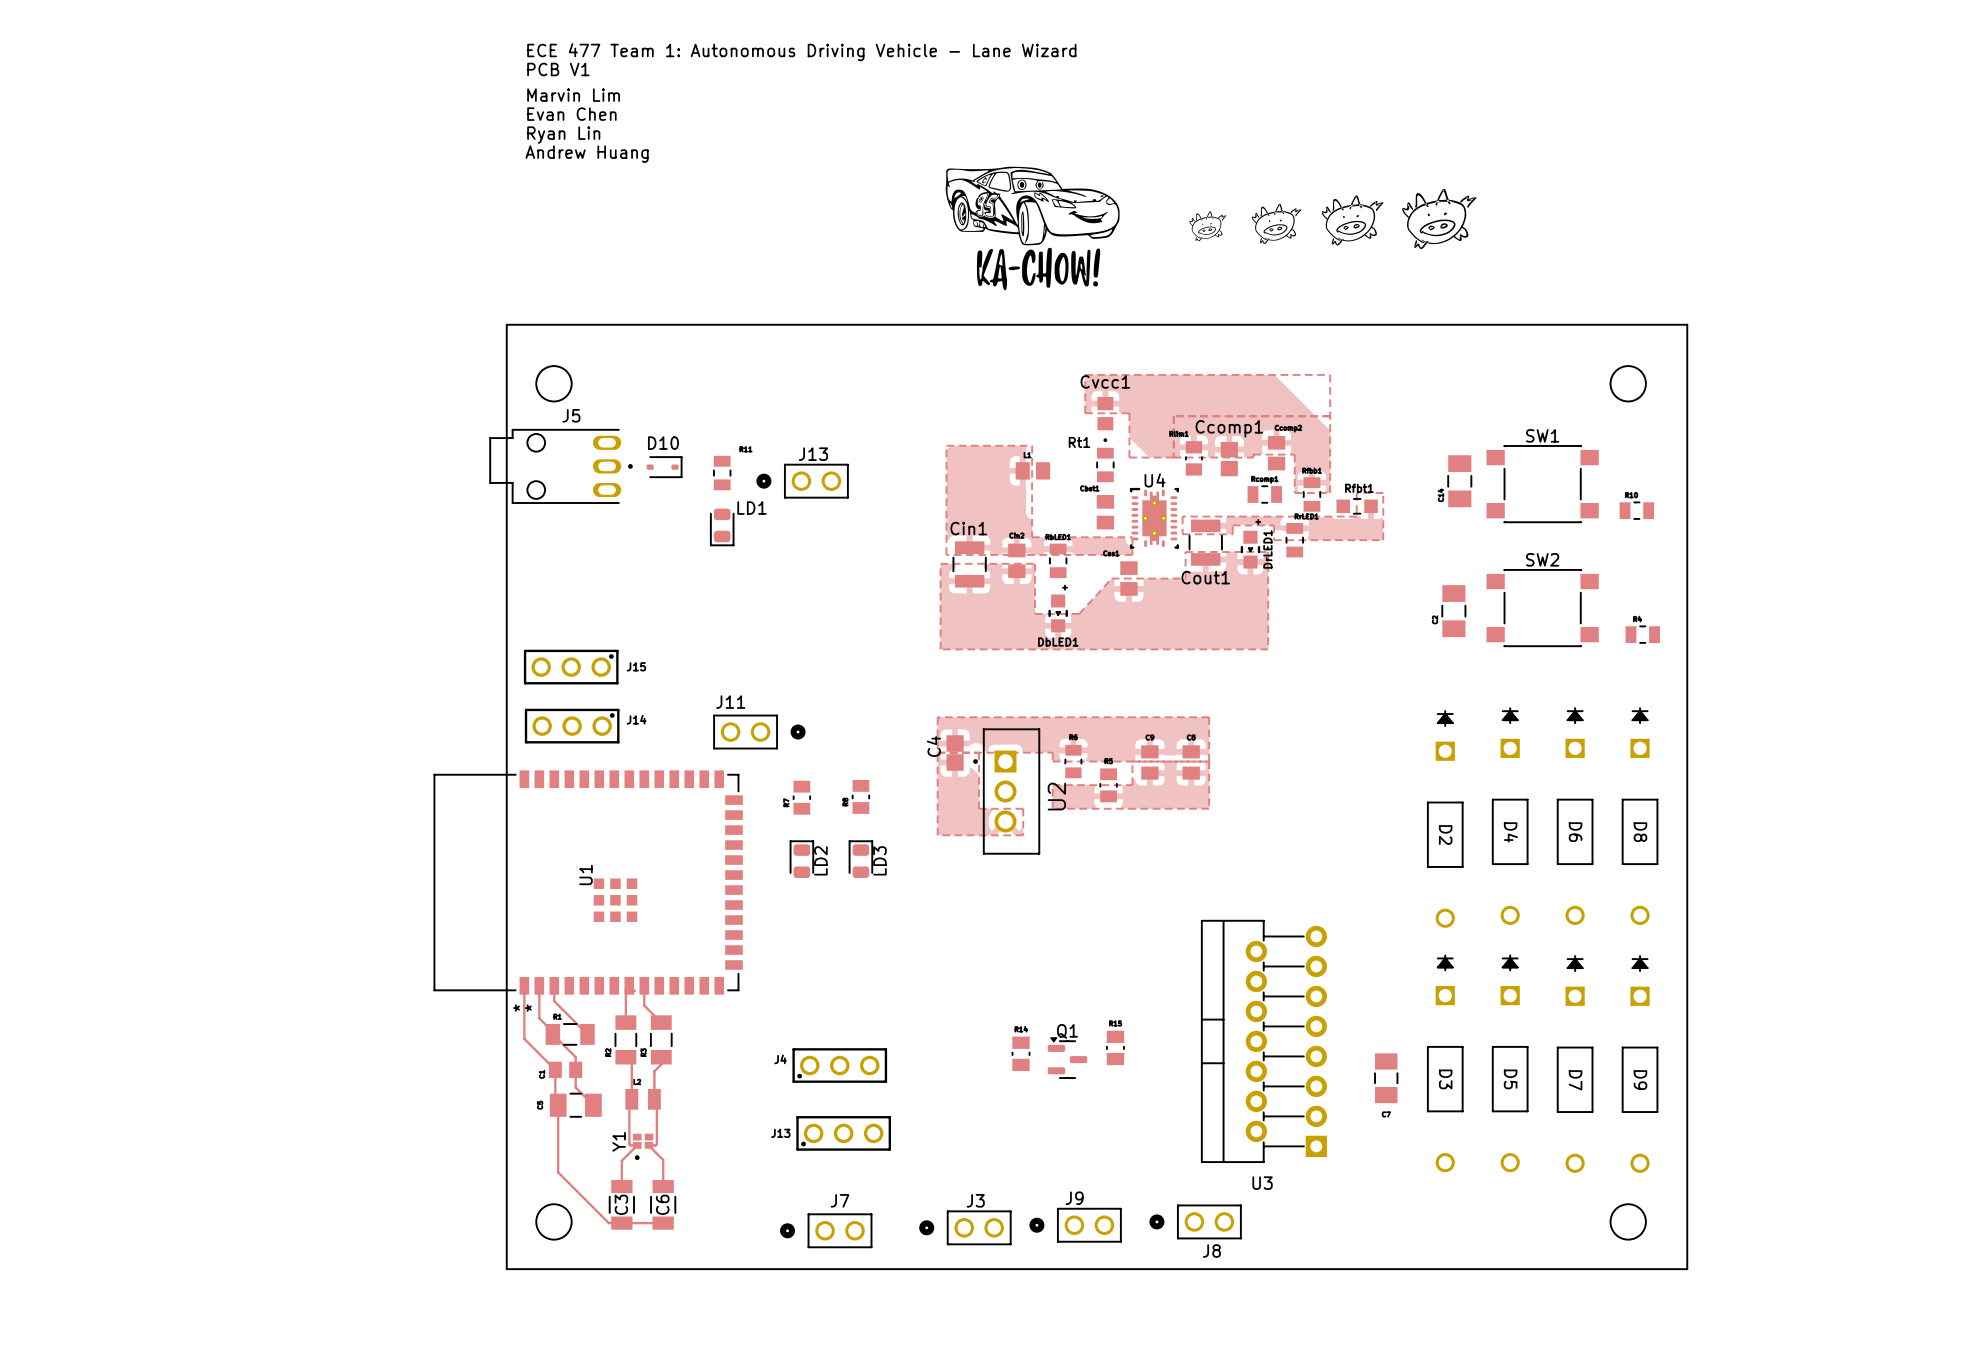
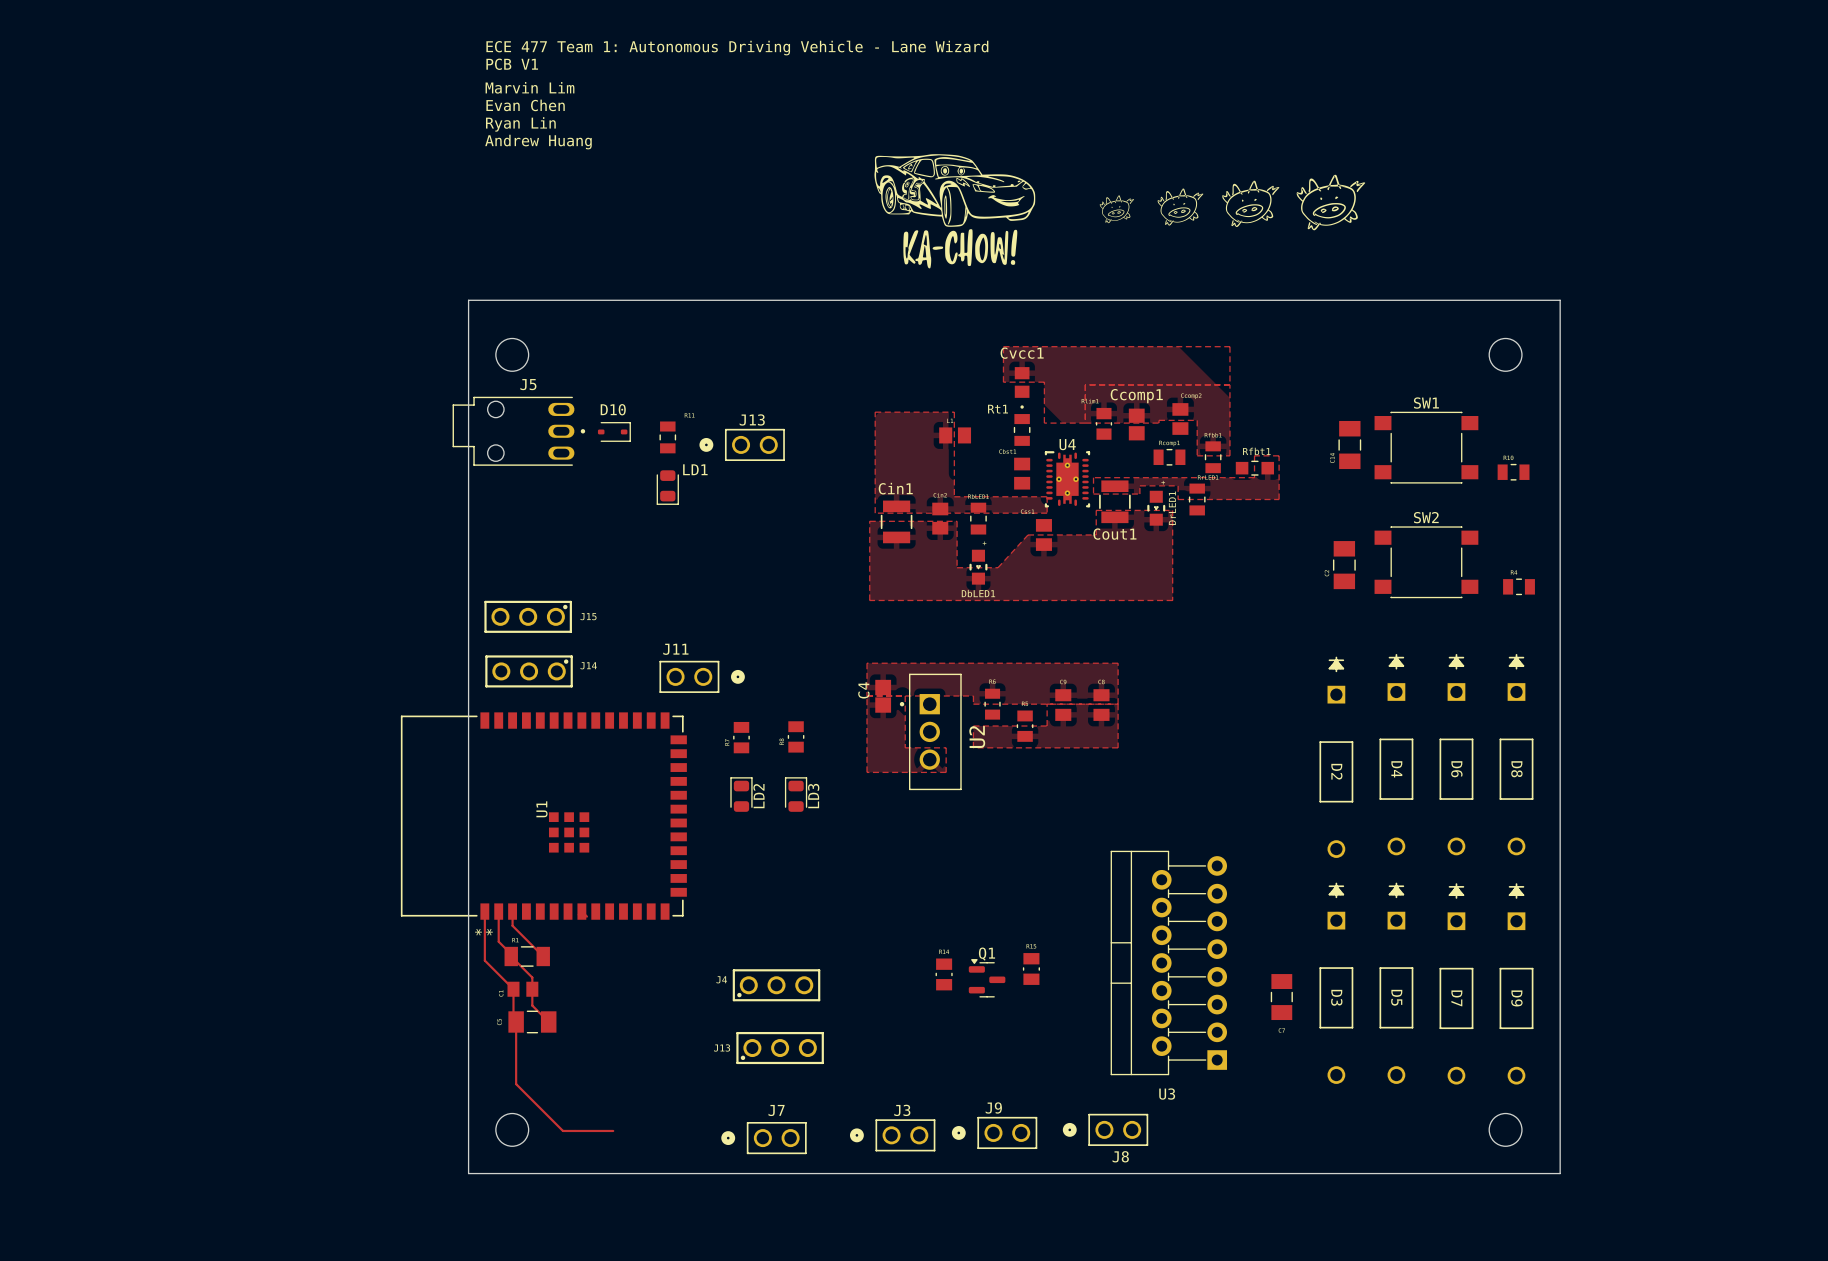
top track: (644, 985) (644, 1005) (661, 1022) -> none
top track: (625, 989) (625, 1022) -> none
part: (625, 1039) -> none
part: (661, 1039) -> none
top track: (625, 1057) (631, 1063) (629, 1144) (637, 1145) (621, 1160) (621, 1186) -> none
top track: (661, 1057) (661, 1064) (654, 1071) -> none
top track: (654, 1071) (656, 1144) (649, 1145) (663, 1159) (663, 1186) -> none
part: (643, 1099) -> none
Y1: (643, 1146) -> none
C3: (621, 1204) -> none
C6: (663, 1204) -> none

